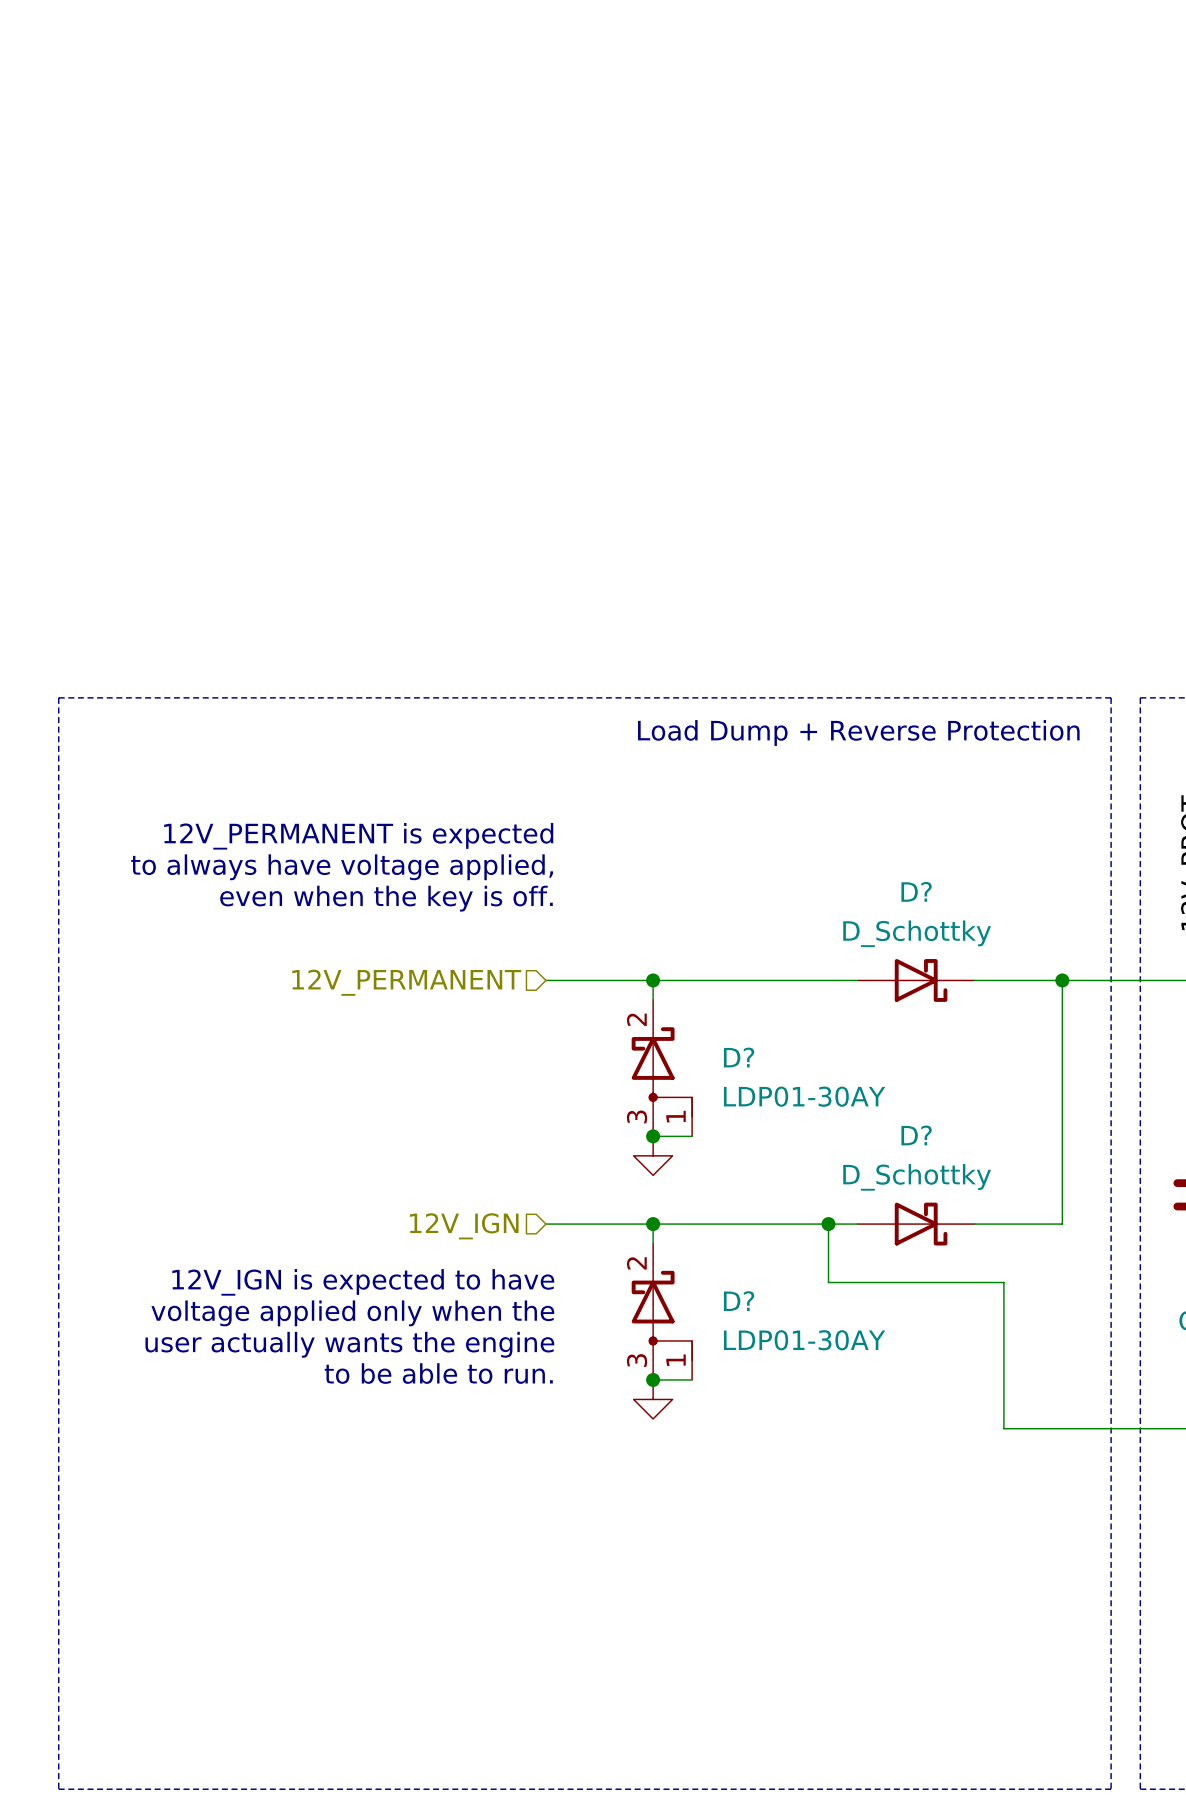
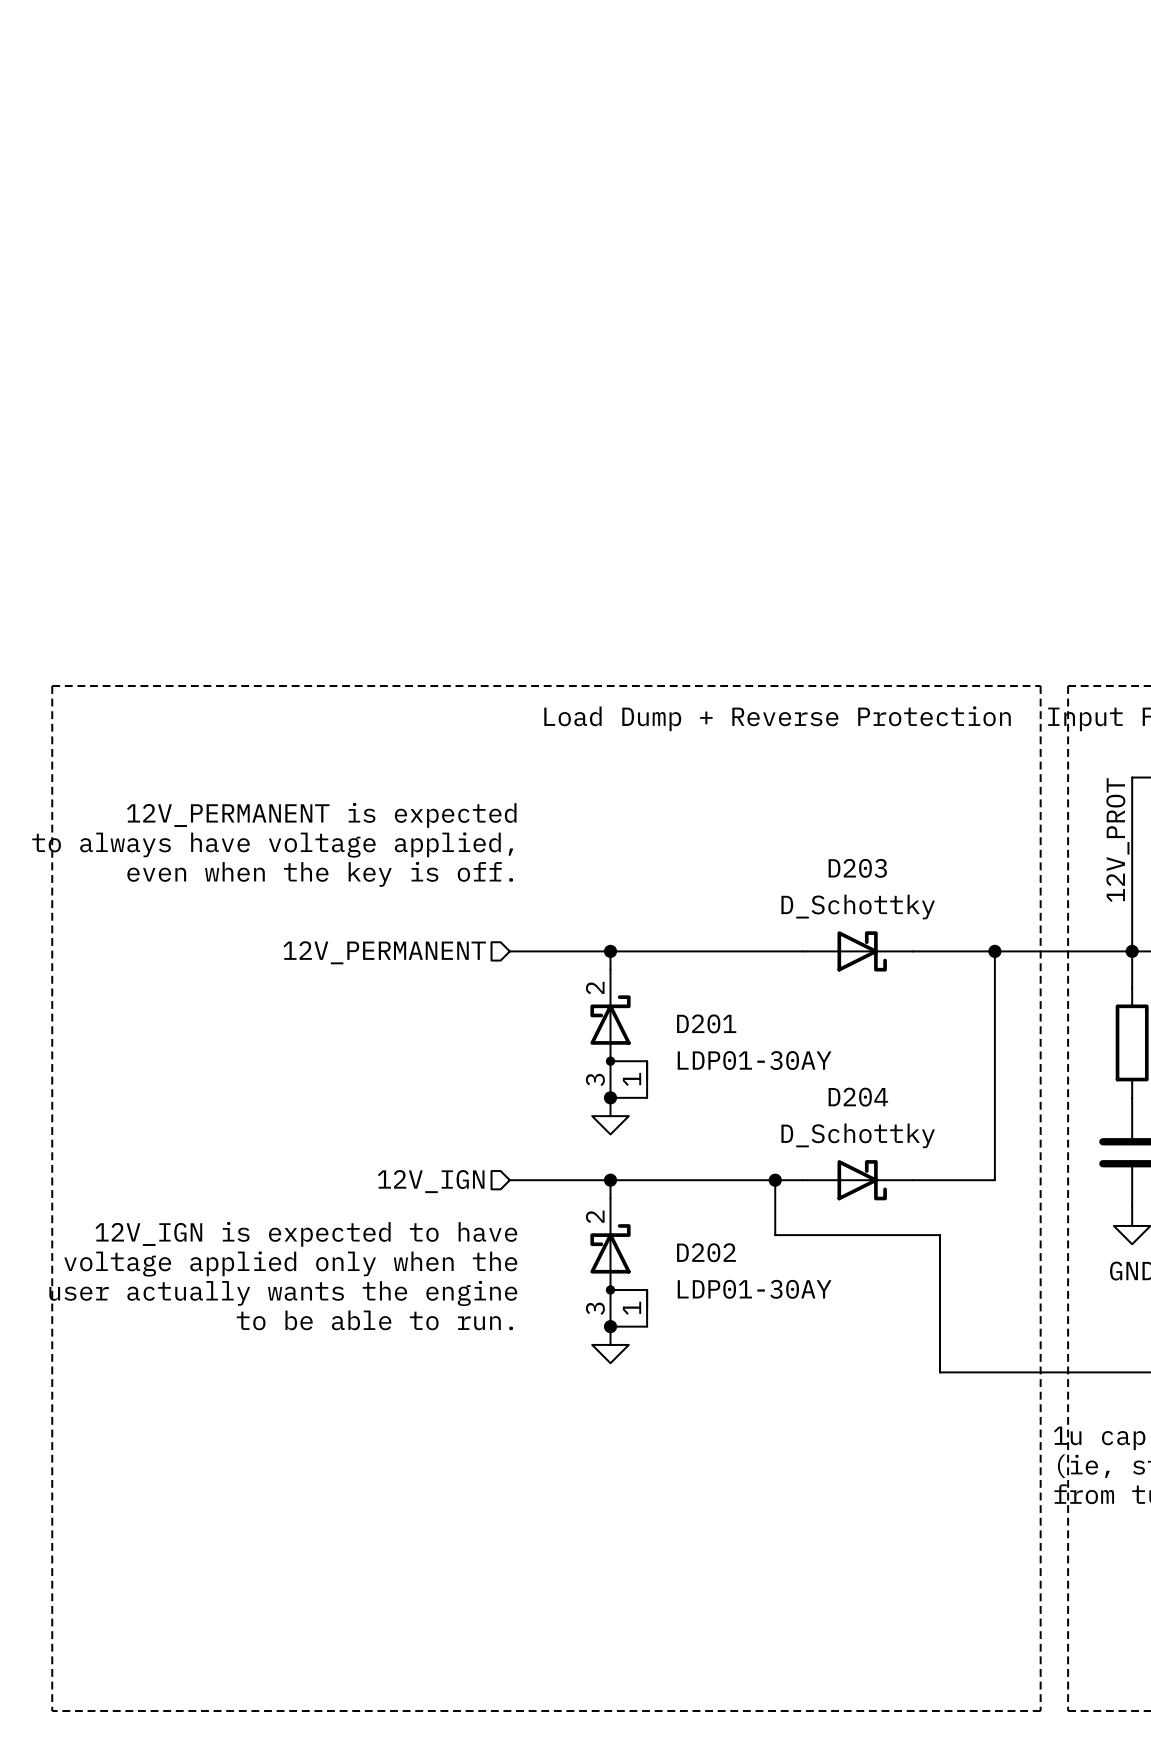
D? name: D? (916, 891) -> D203 (857, 868)
D? name: D? (739, 1057) -> D201 (706, 1023)
D? name: D? (916, 1135) -> D204 (858, 1097)
D? name: D? (739, 1301) -> D202 (706, 1252)

